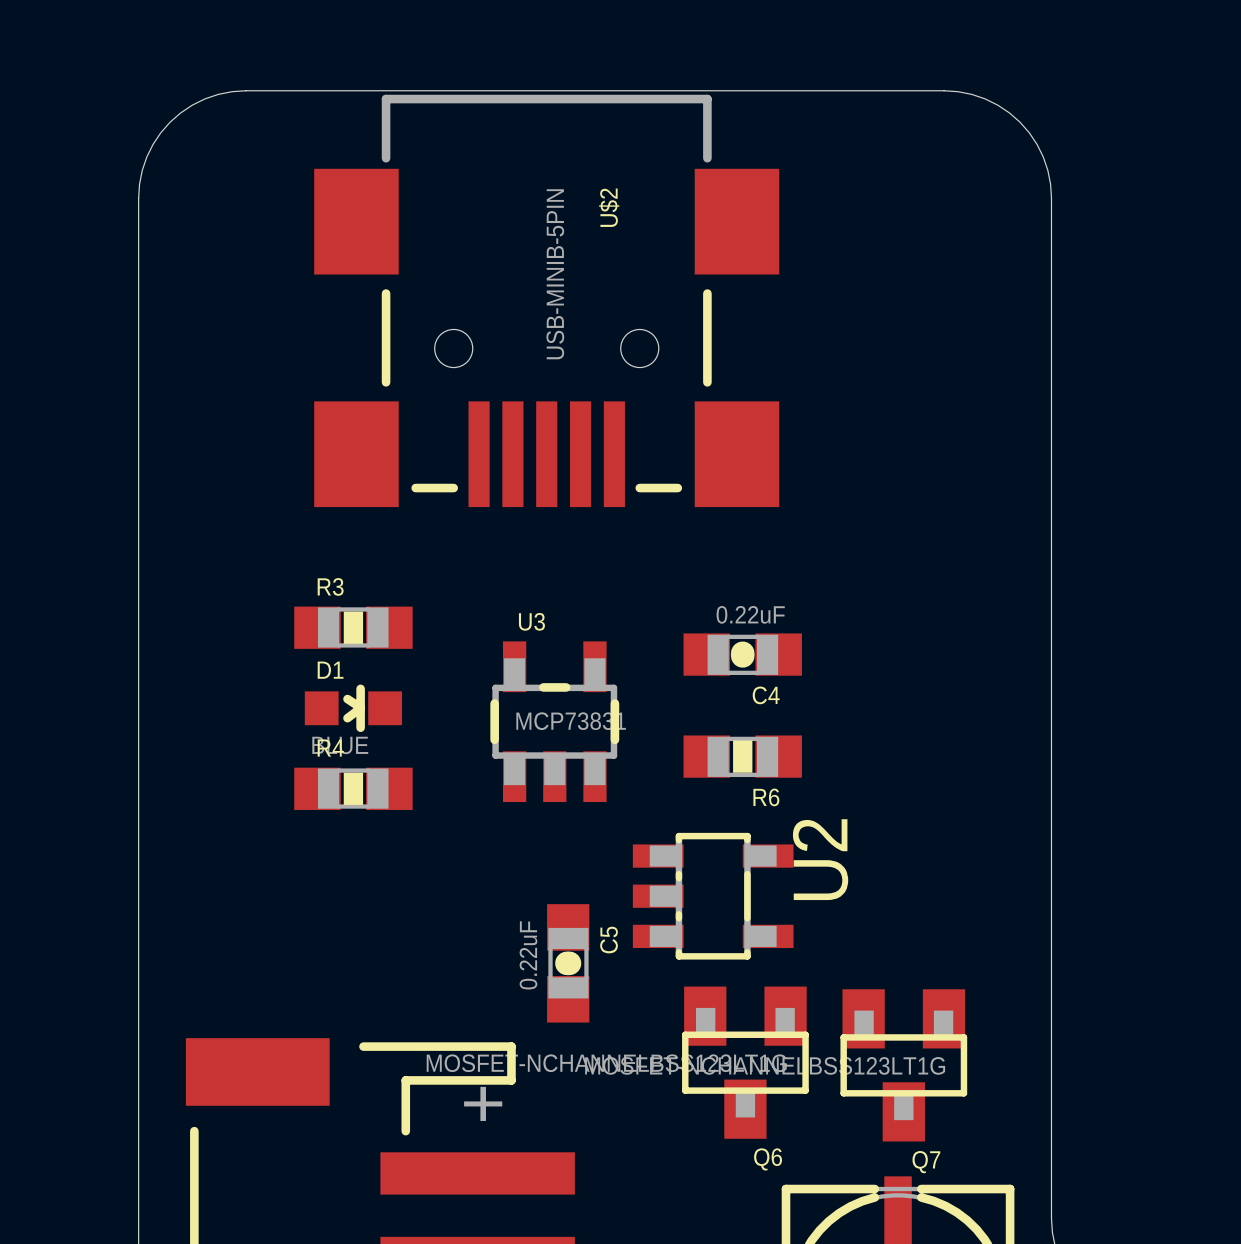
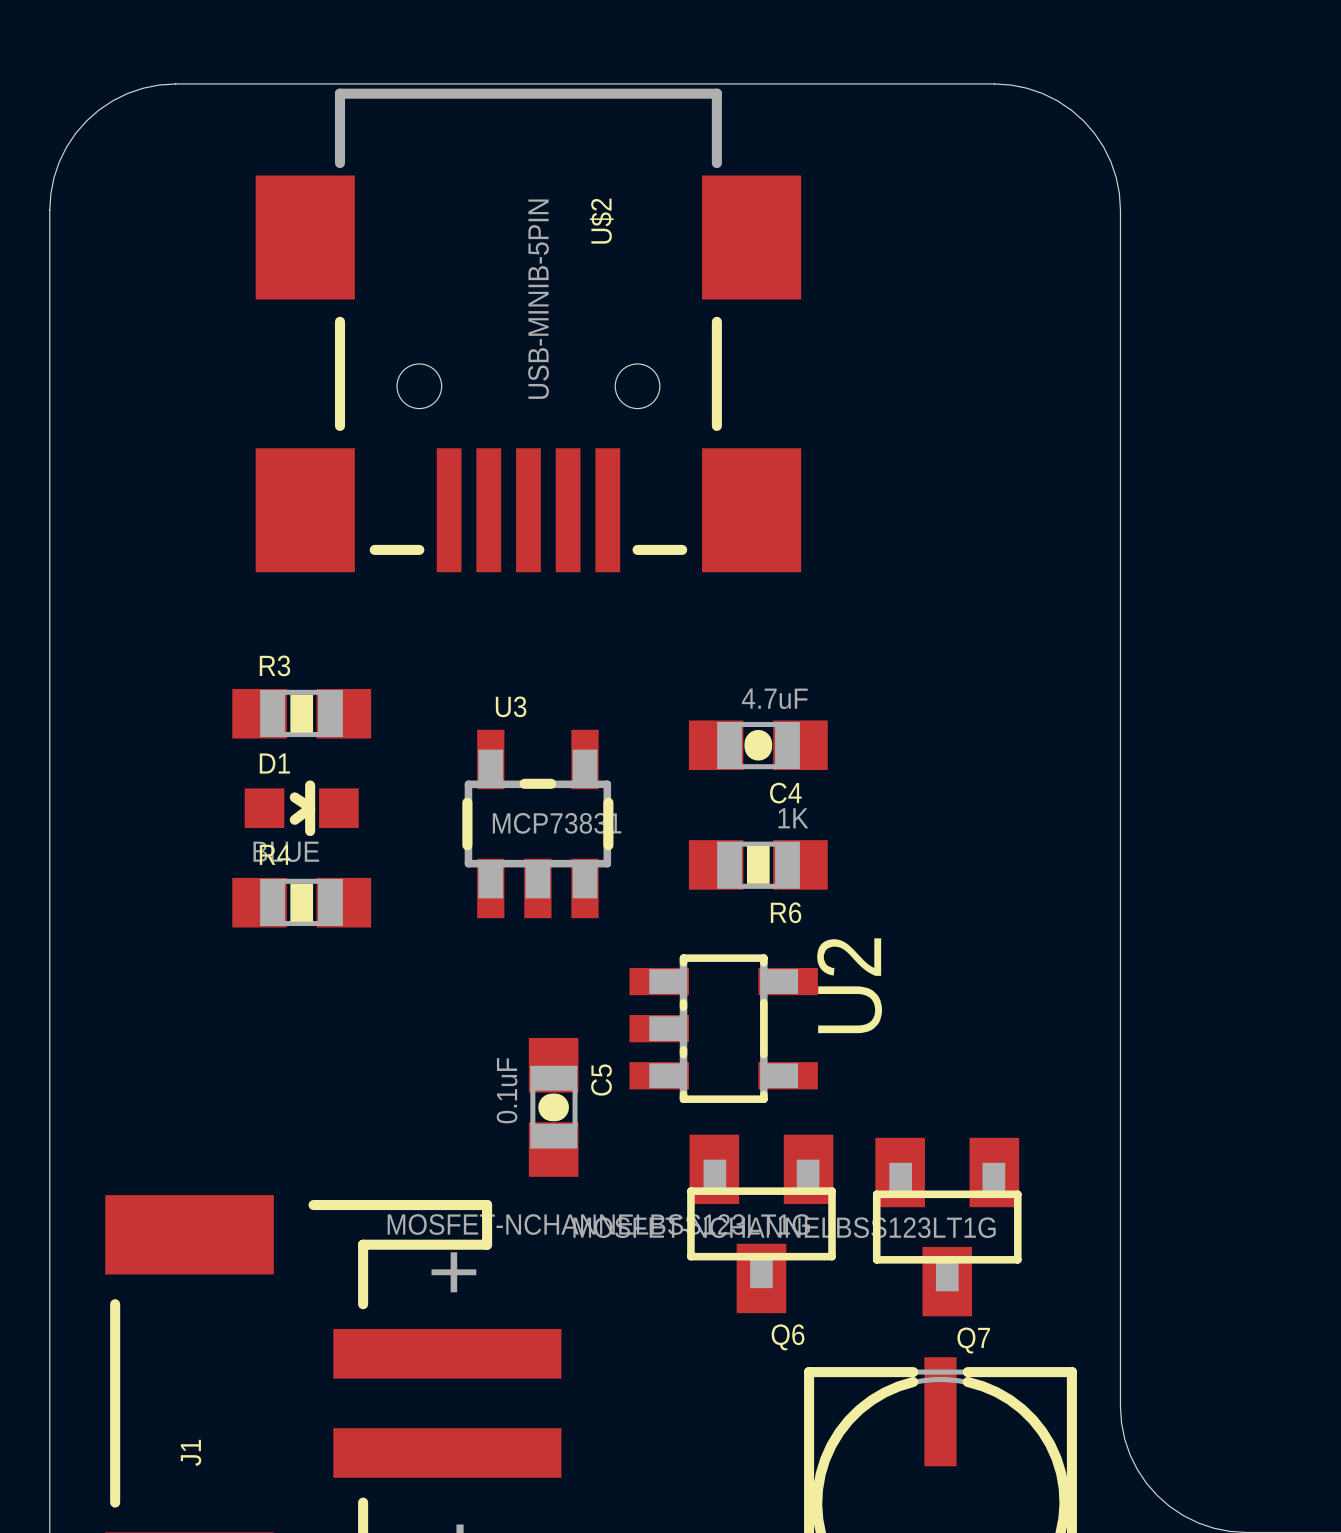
C4 value: 0.22uF (750, 614) -> 4.7uF (774, 698)
R6 value: none -> 1K (793, 818)
C5 value: 0.22uF (528, 955) -> 0.1uF (507, 1090)

